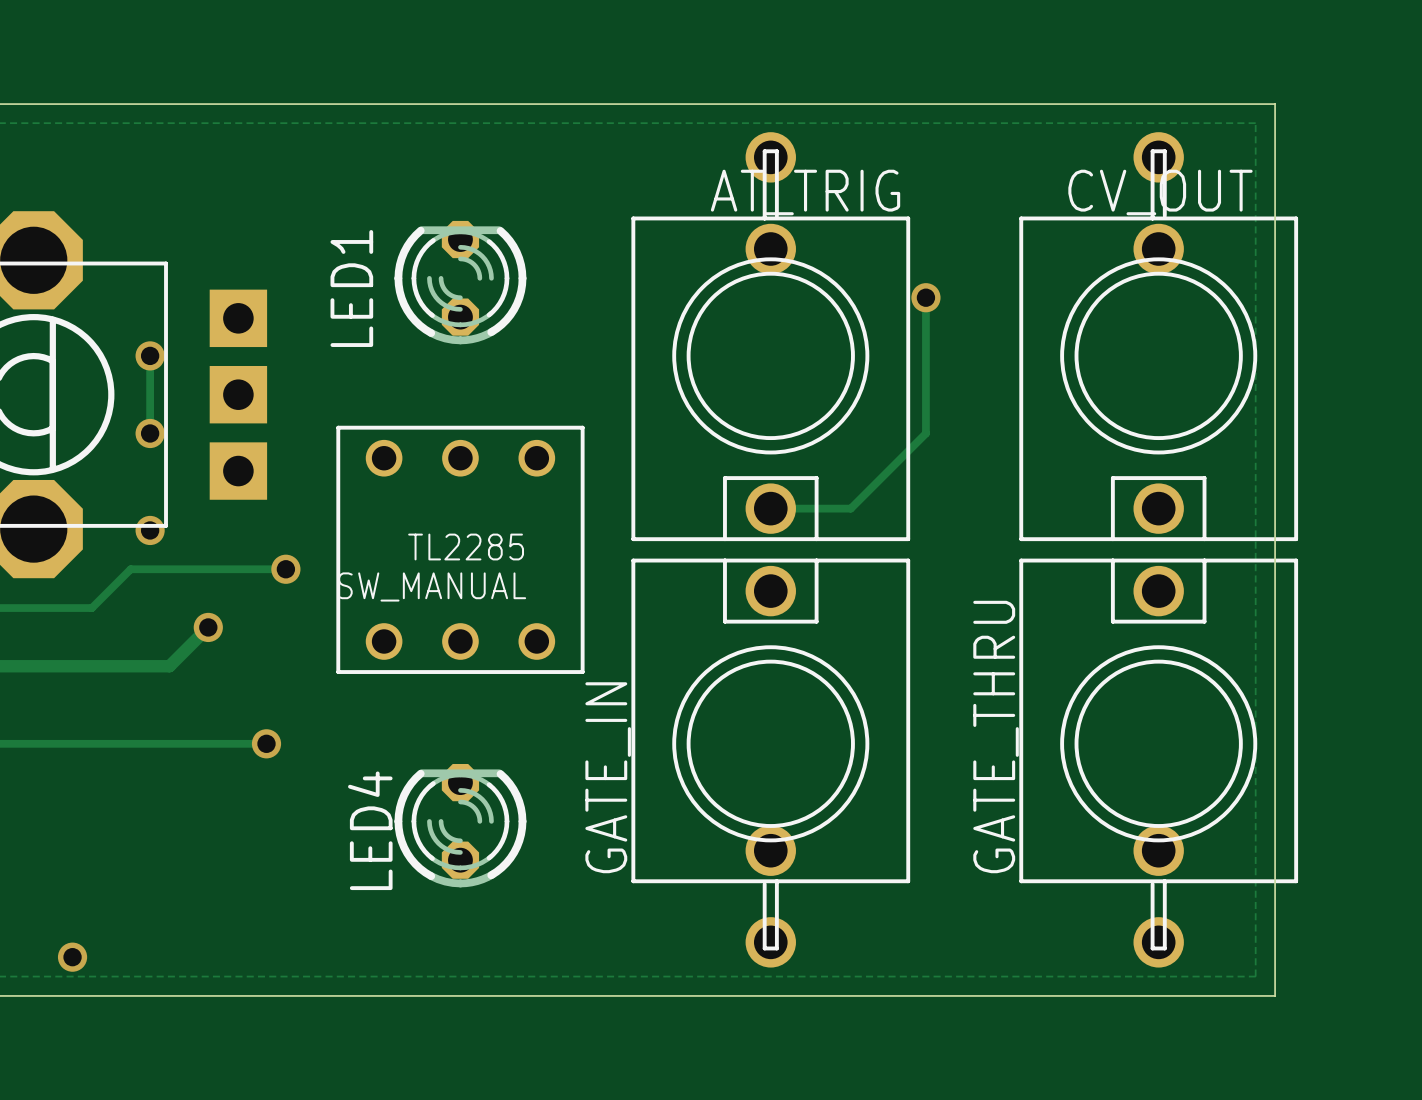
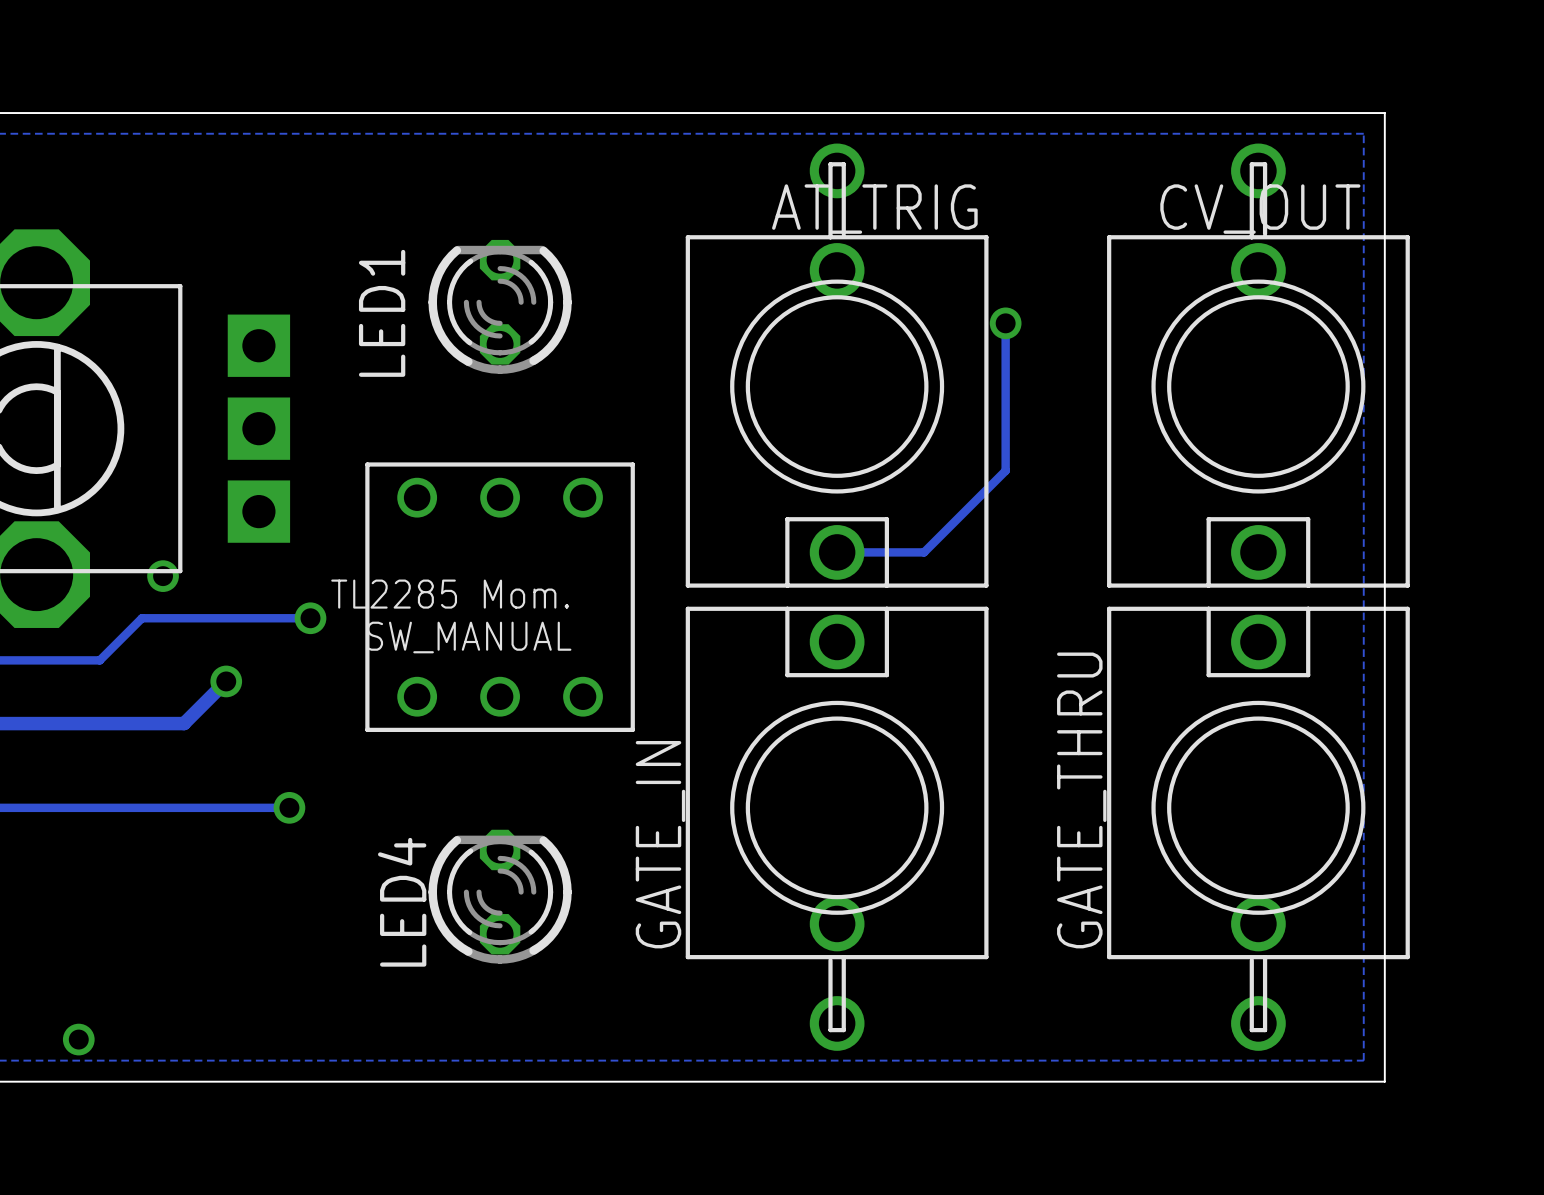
track: (150, 355) (150, 433) -> none
via: (150, 355) -> none
via: (150, 433) -> none
SW_MANUAL value: TL2285 (466, 547) -> TL2285 Mom. (450, 594)

